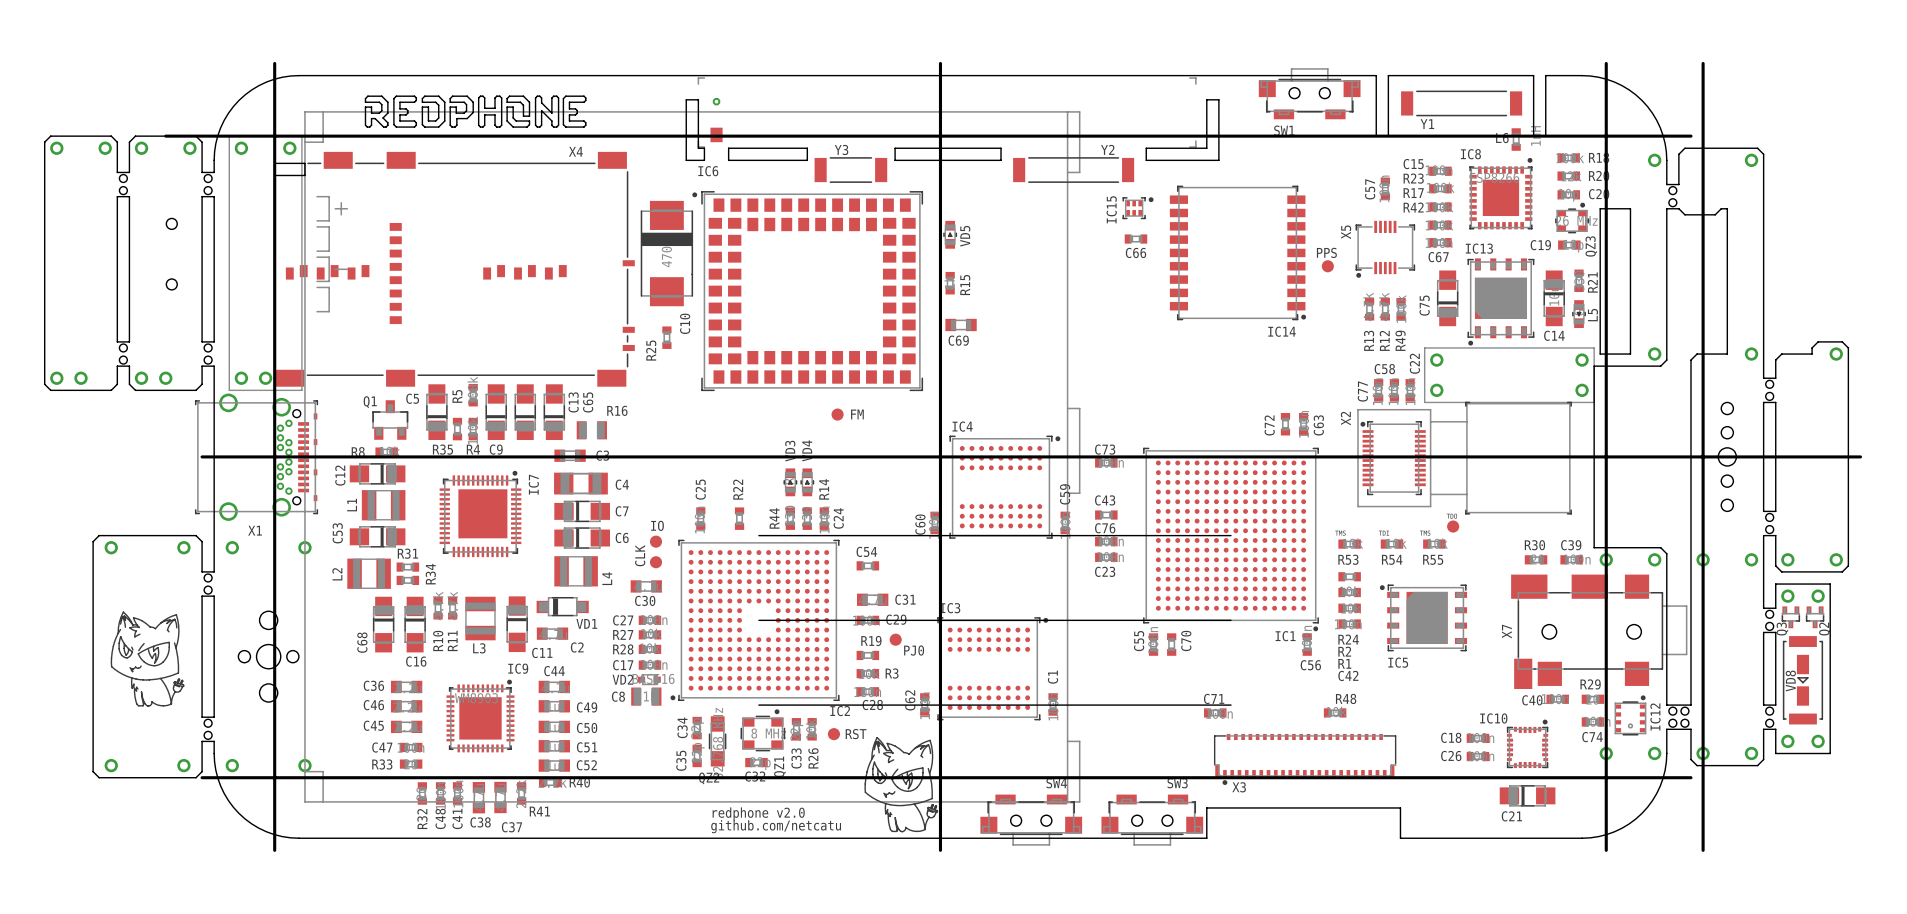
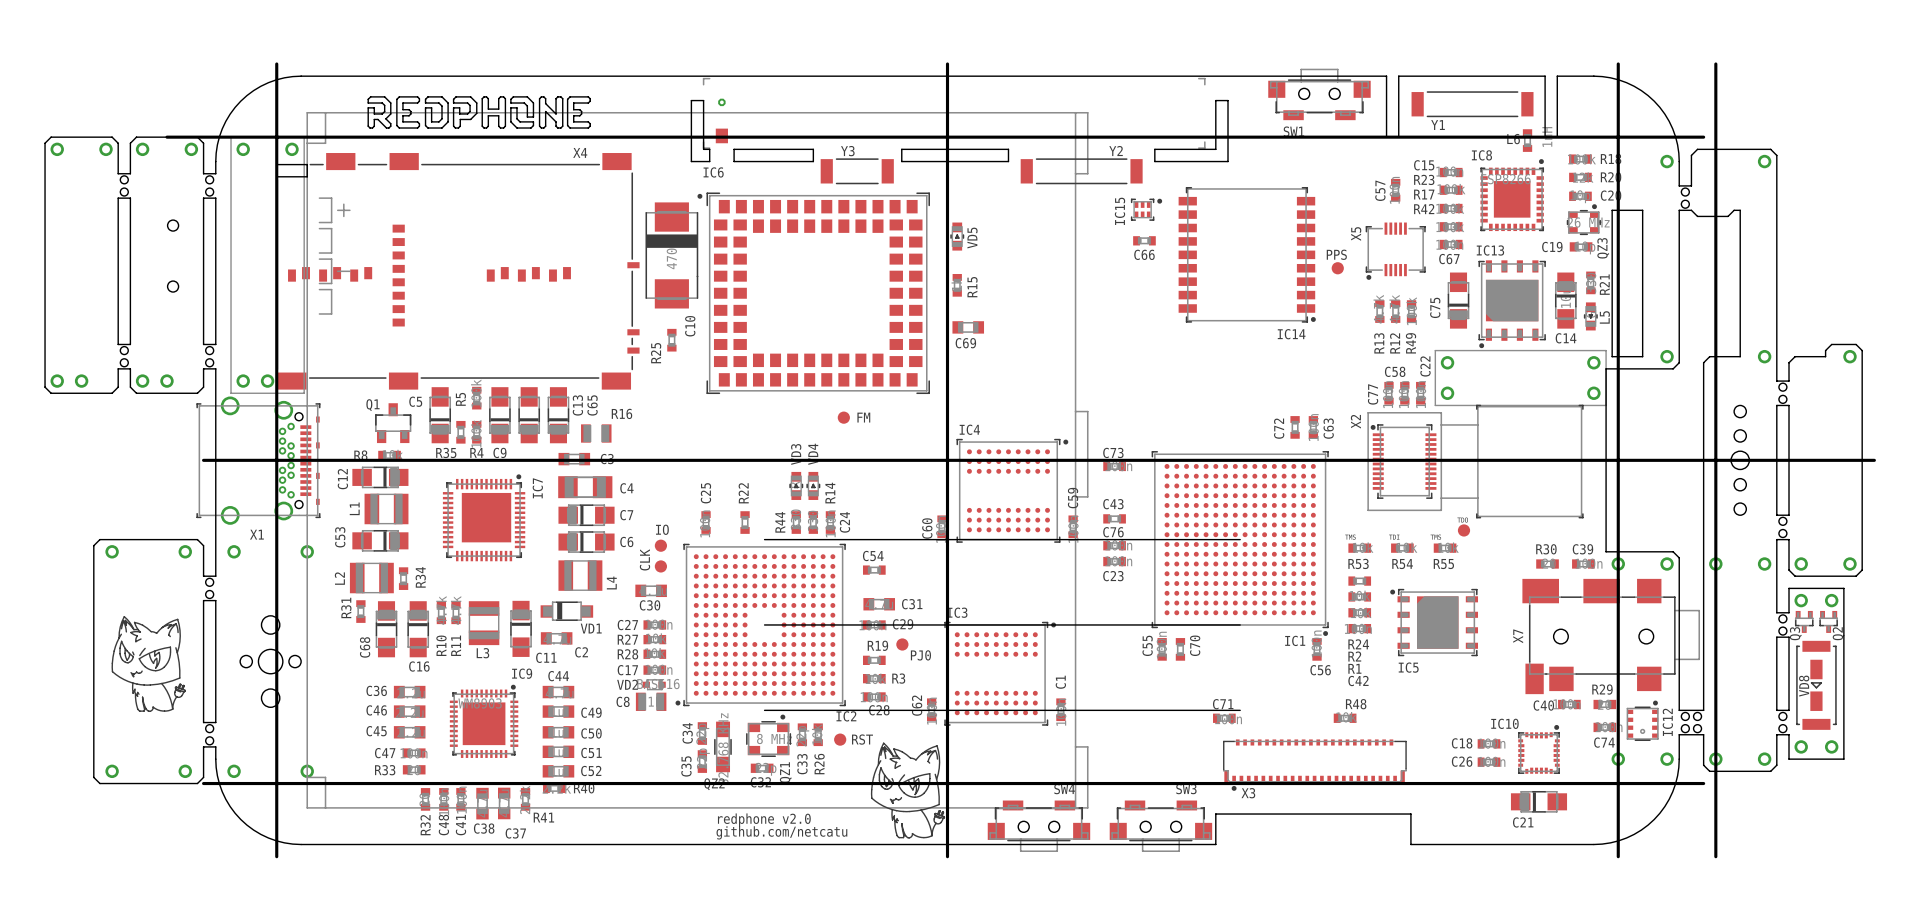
R31 name position: R31 (407, 553) -> R31 (346, 607)
R34 rotation: 0° (407, 567) -> 90° clockwise (403, 578)
R31 rotation: 0° (407, 580) -> 90° clockwise (360, 611)
R31 position: (407, 580) -> (360, 611)

